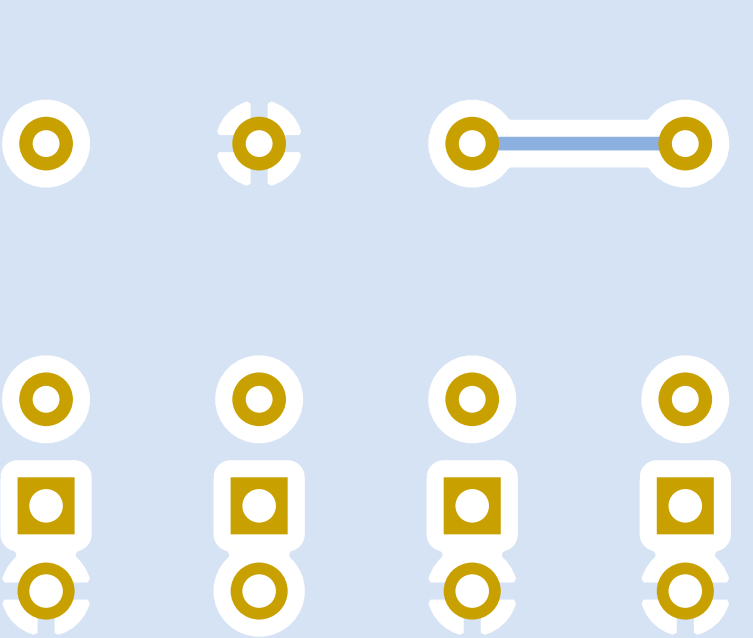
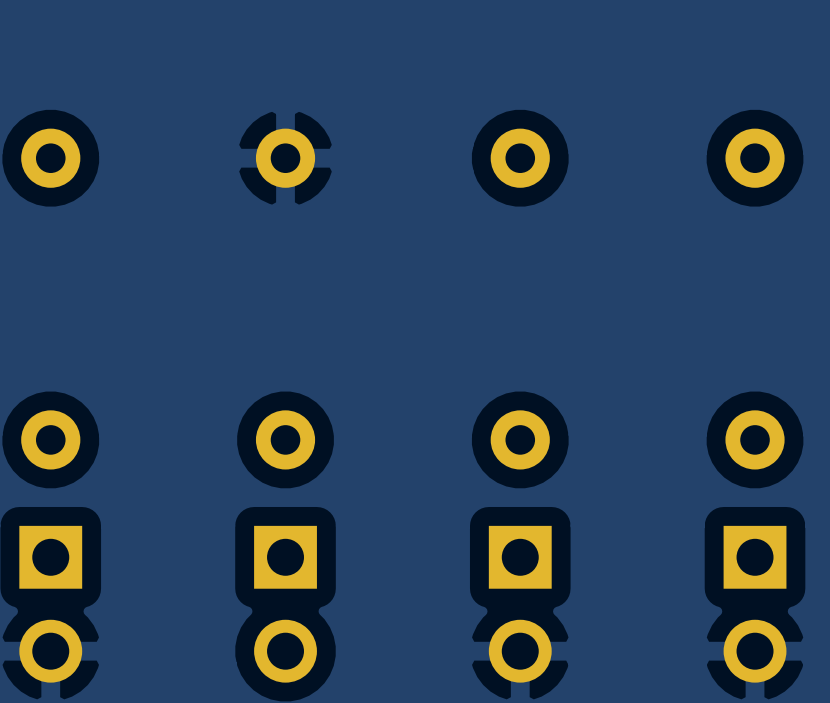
track: (685, 143) (472, 143) -> none

